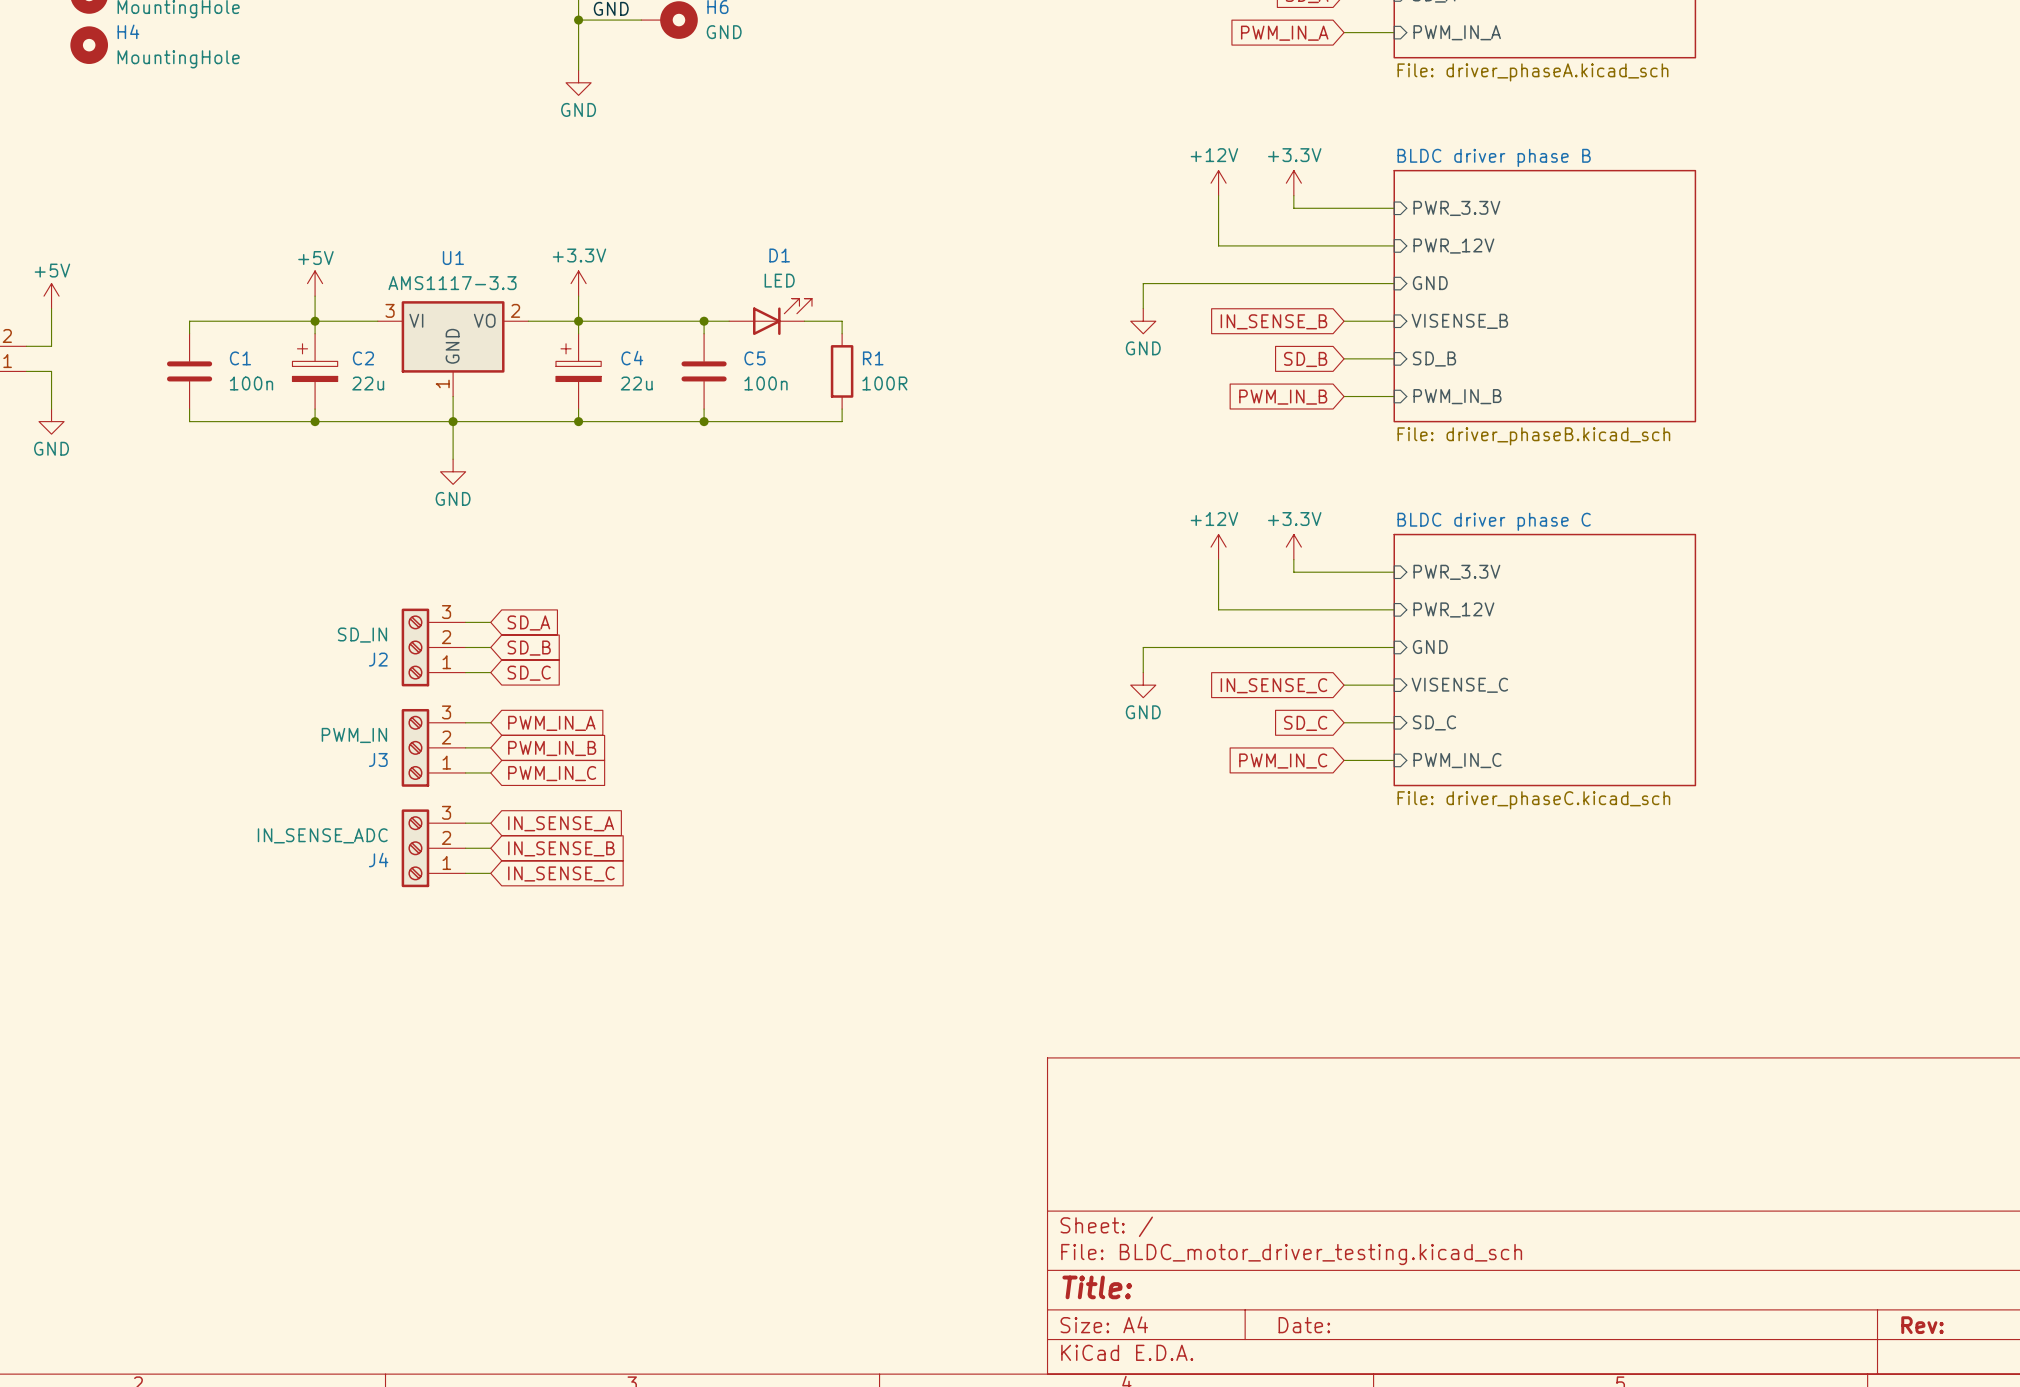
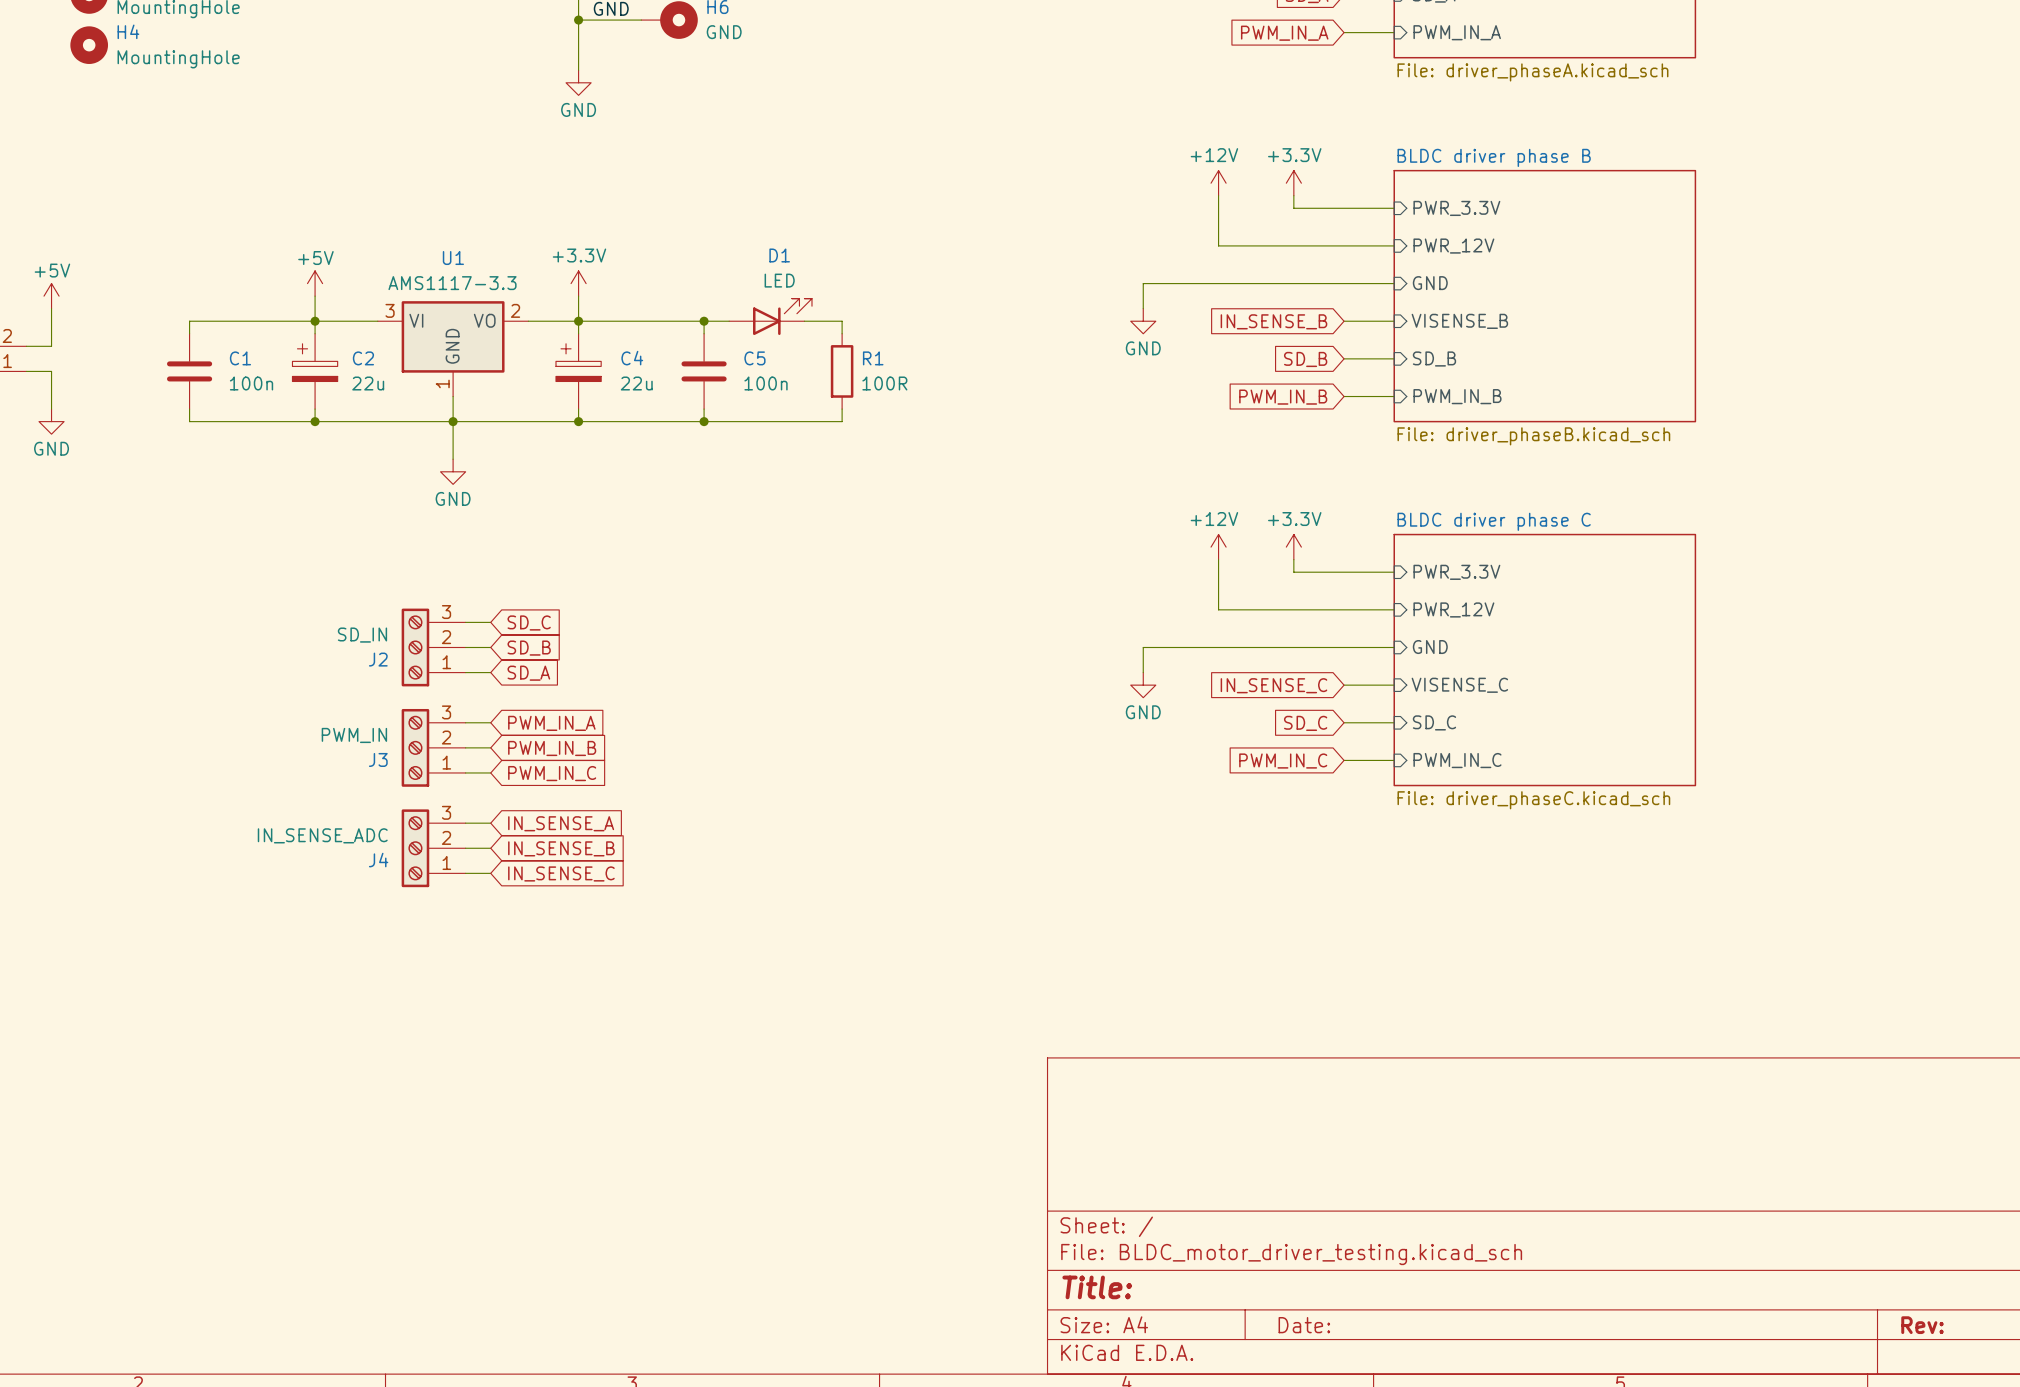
global label: SD_A (528, 622) -> SD_C (529, 622)
global label: SD_C (529, 673) -> SD_A (528, 673)

